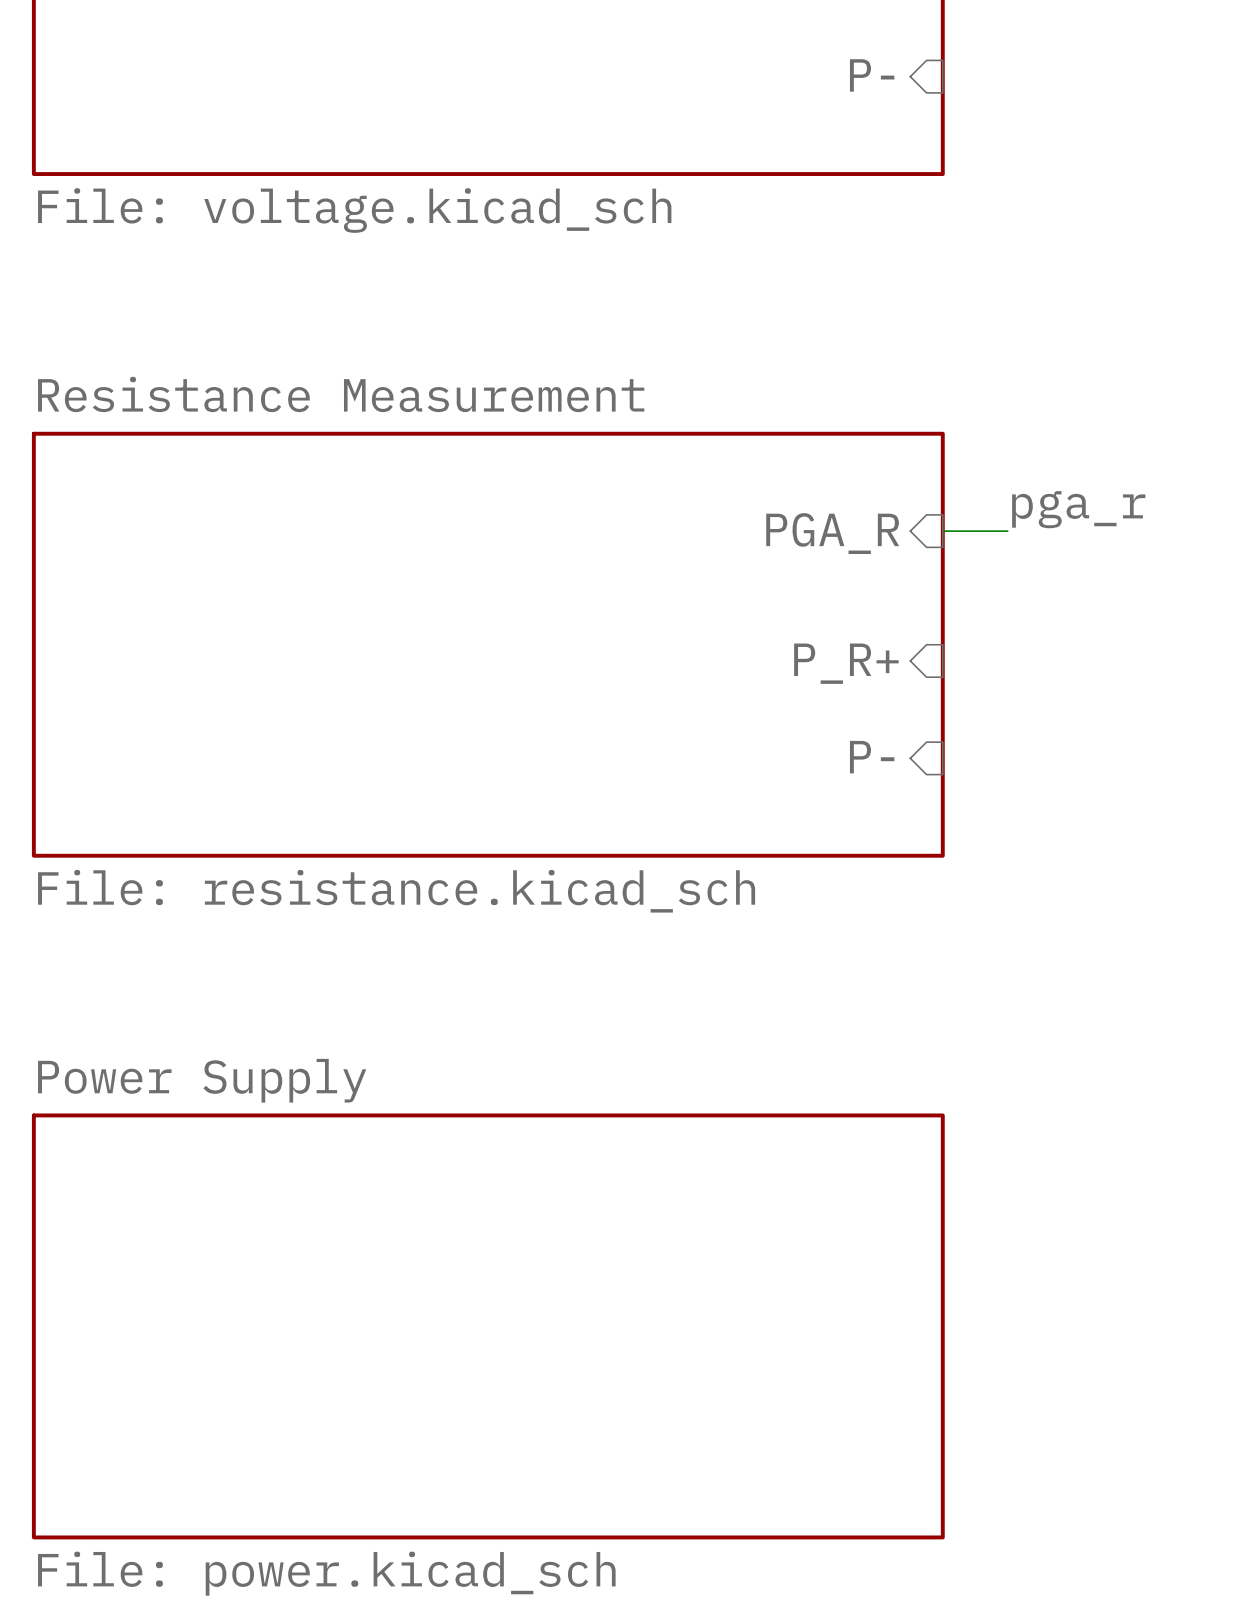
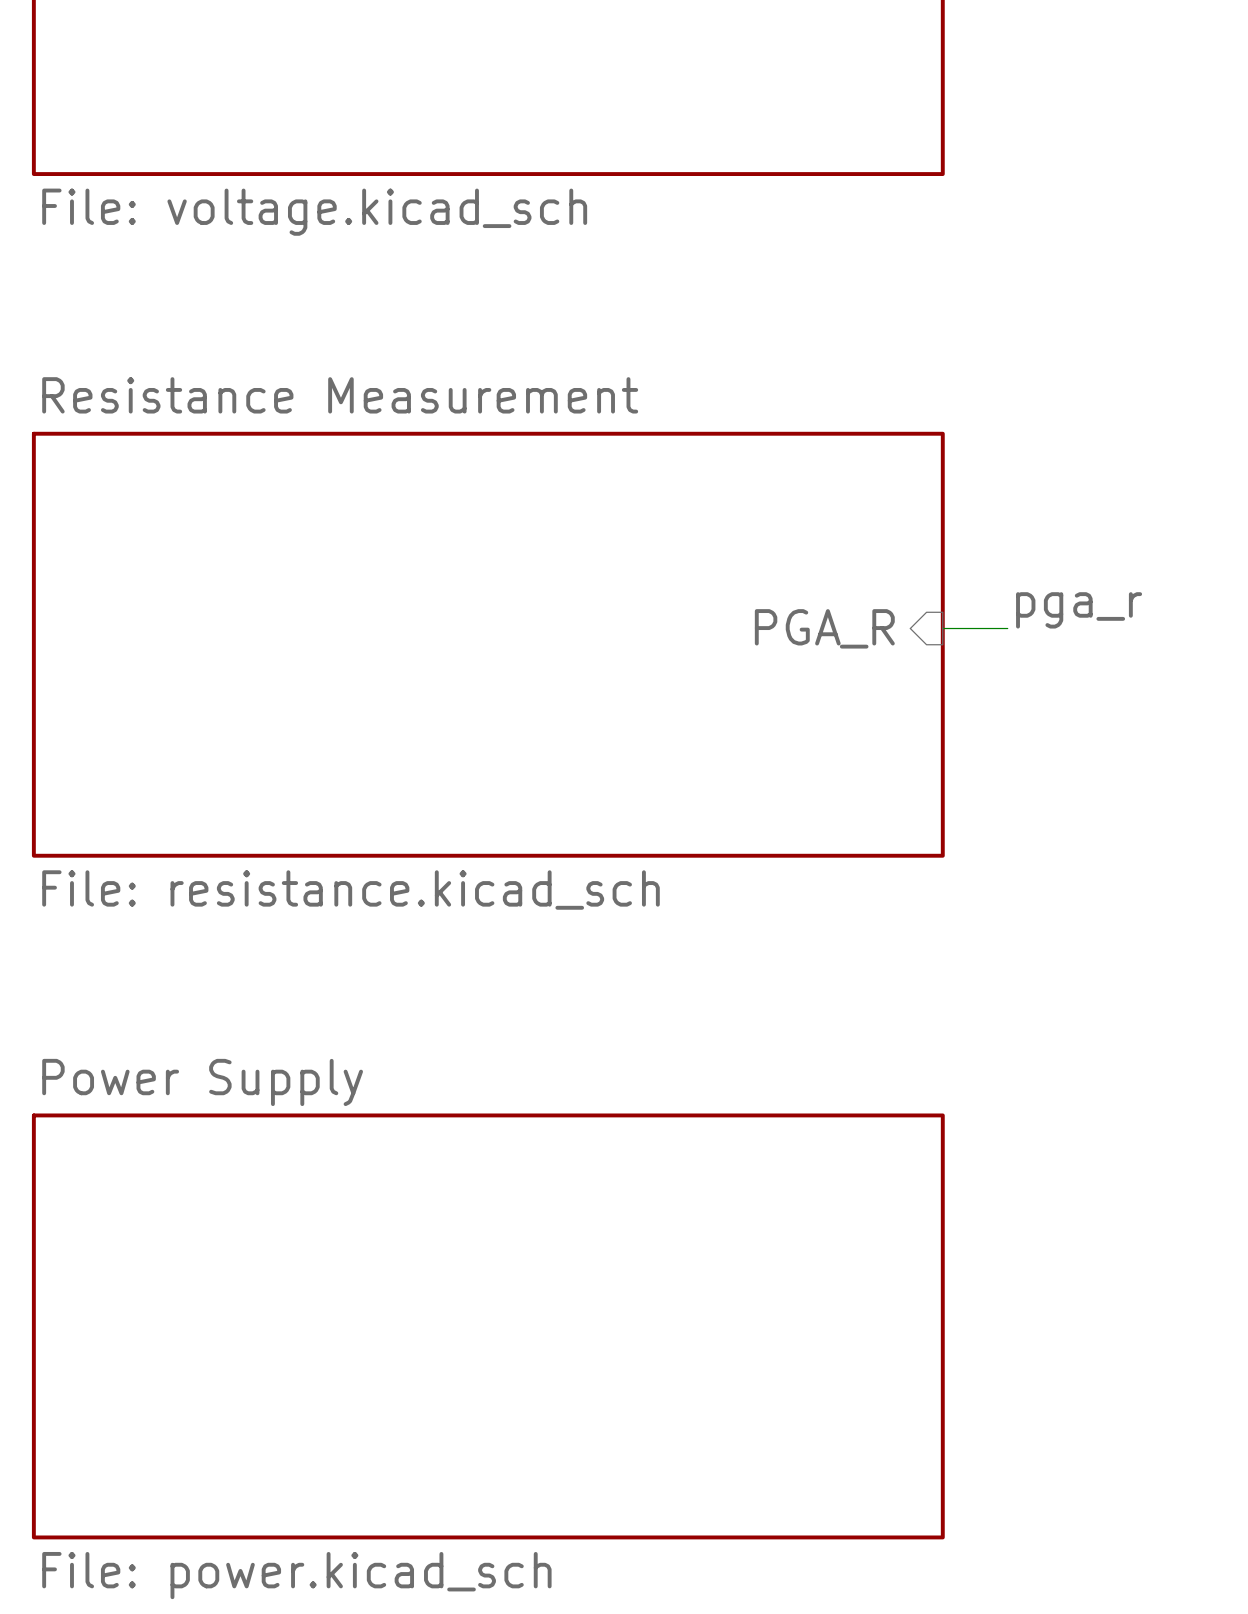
sheet pin: P- (872, 75) -> none
label position: pga_r (1078, 509) -> pga_r (1079, 610)
wire: (942, 531) (1007, 531) -> (942, 628) (1007, 628)
sheet pin position: PGA_R (832, 533) -> PGA_R (824, 628)
sheet pin: P_R+ (846, 663) -> none
sheet pin: P- (872, 757) -> none

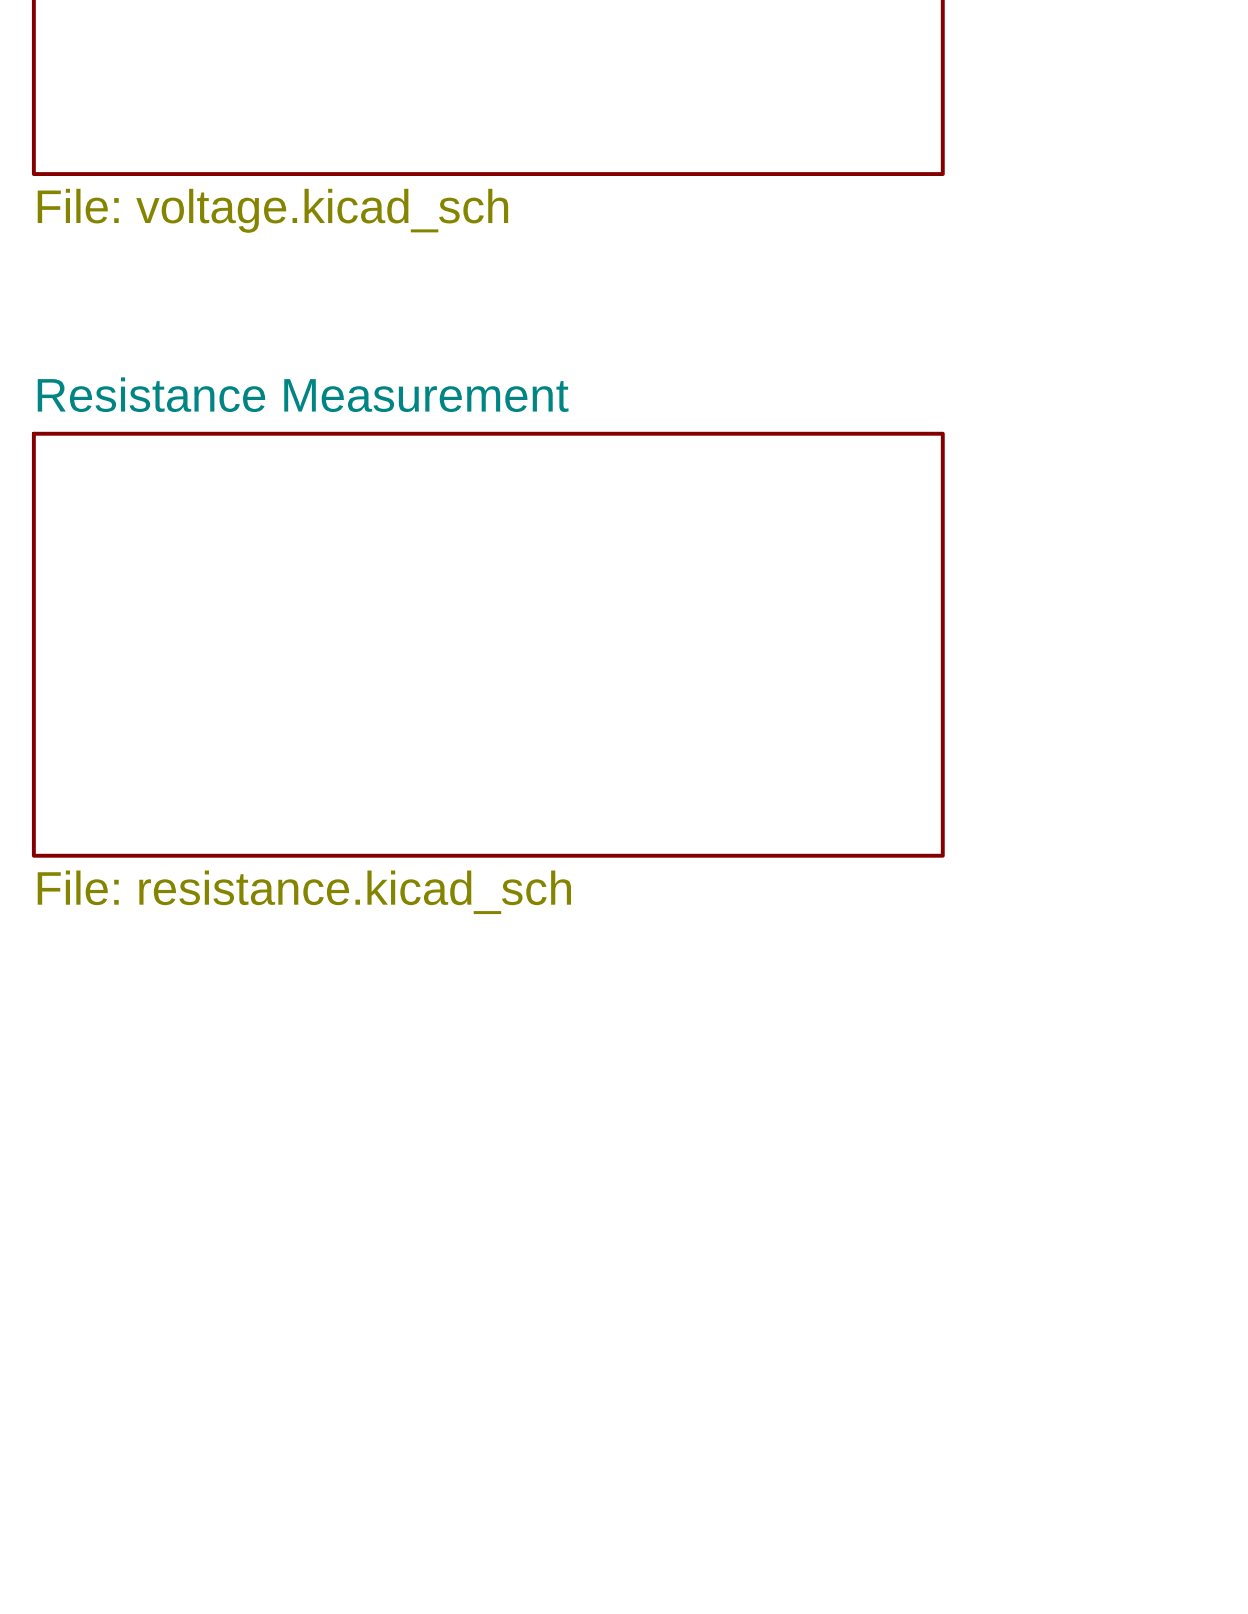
label: pga_r (1079, 610) -> none
sheet pin: PGA_R (824, 628) -> none
wire: (942, 628) (1007, 628) -> none
sheet Power Supply: File: power.kicad_sch (488, 1326) -> none

